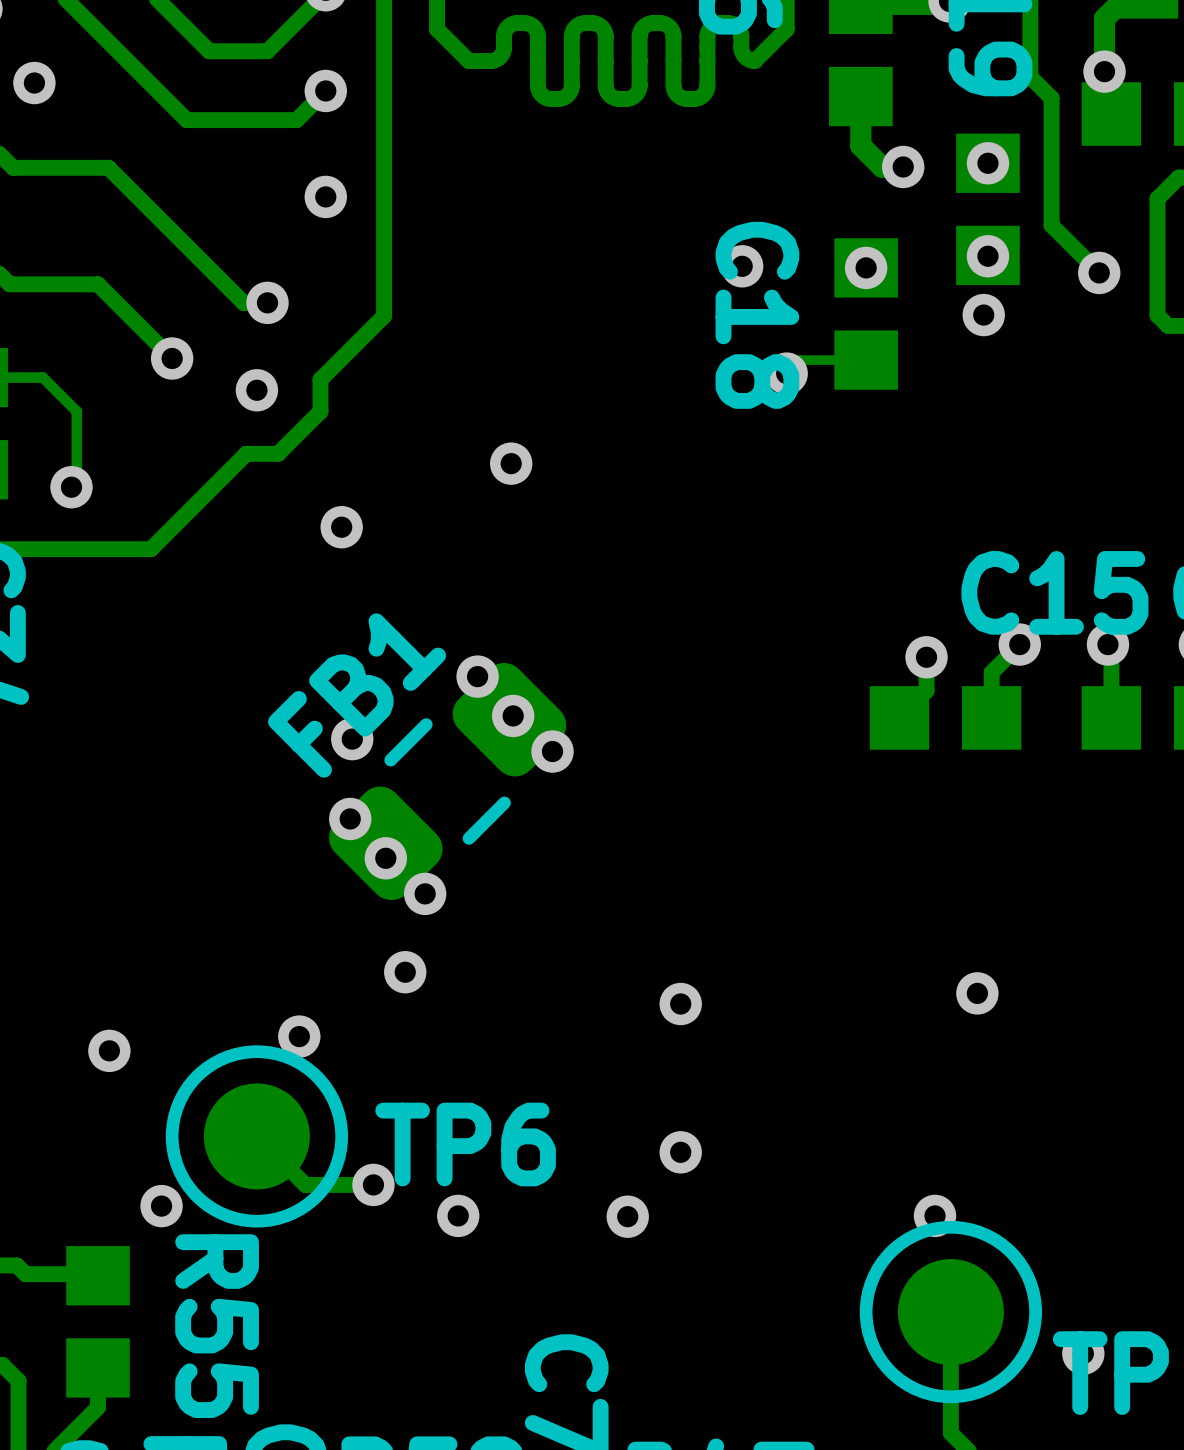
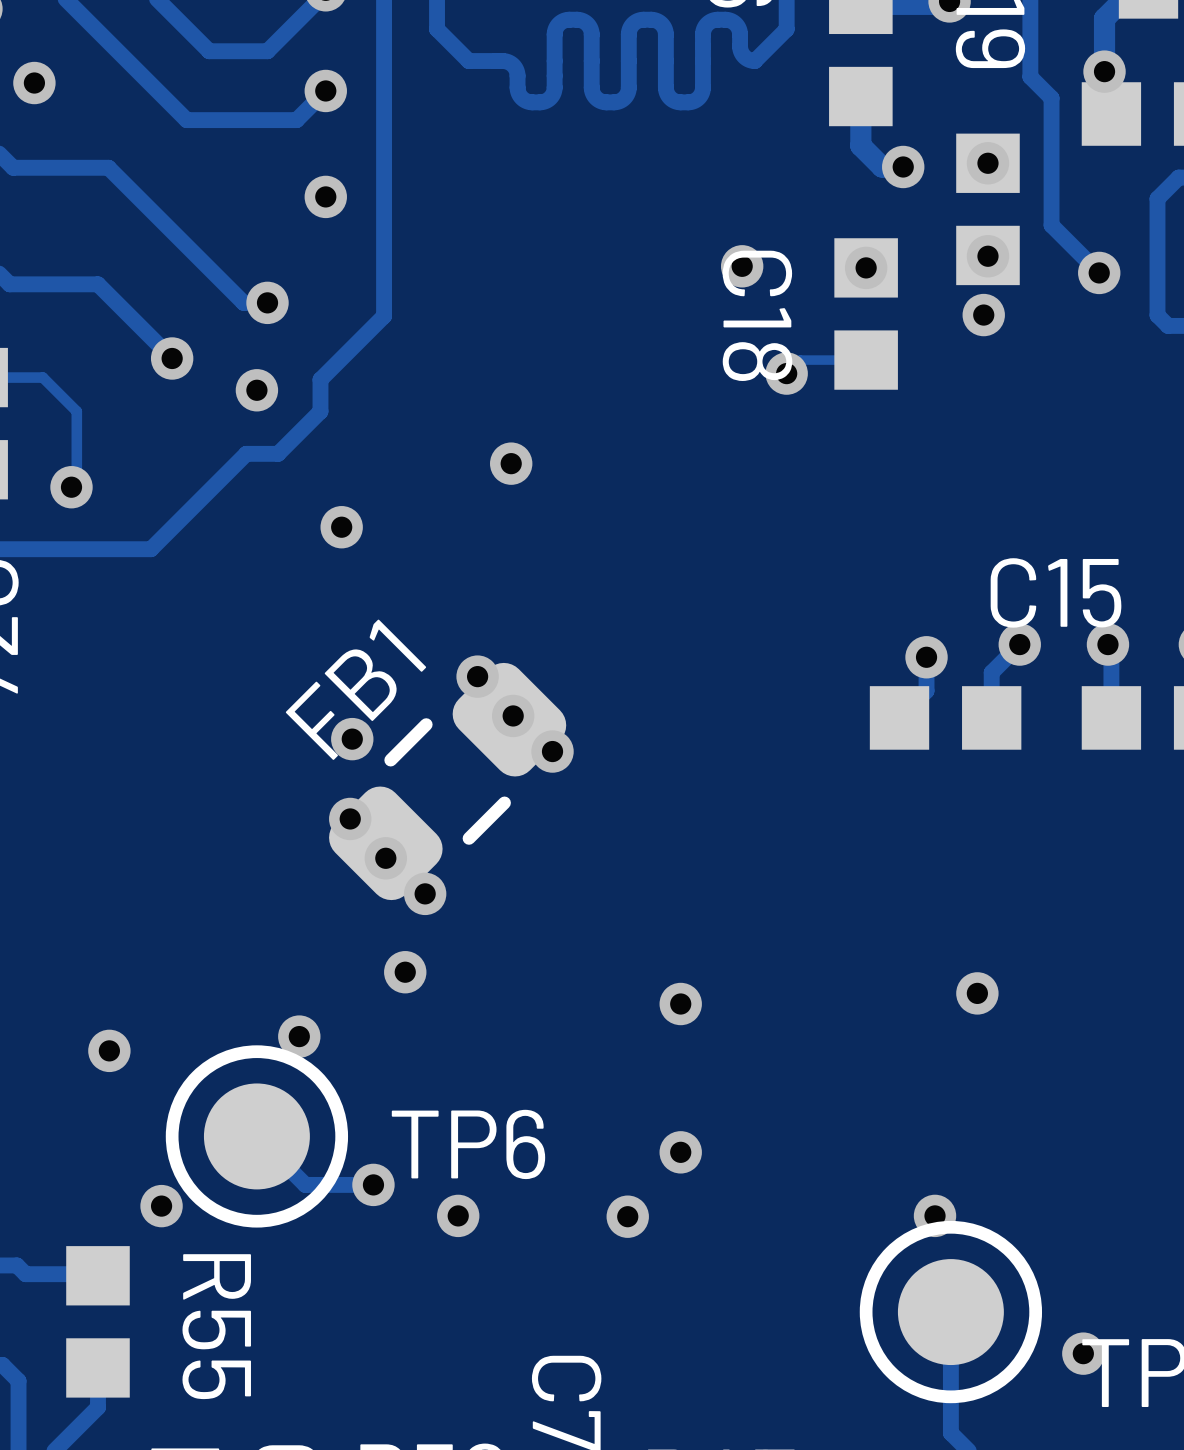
track: (754, 61) (747, 58) (742, 53) (740, 33) (736, 26) (727, 23) (713, 25) (707, 35) (707, 88) (702, 96) (693, 98) (681, 97) (674, 89) (673, 33) (669, 27) (662, 23) (648, 23) (640, 30) (639, 88) (635, 95) (629, 98) (614, 98) (607, 91) (605, 33) (601, 27) (595, 23) (580, 23) (573, 30) (571, 86) (568, 93) (562, 98) (546, 98) (539, 91) (537, 35) (535, 29) (530, 24) (516, 23) (507, 27) (504, 33) (502, 53) (497, 58) (490, 61) -> (754, 61) (746, 58) (741, 52) (739, 31) (734, 22) (725, 19) (709, 21) (703, 32) (702, 90) (697, 99) (688, 102) (674, 100) (666, 92) (665, 31) (661, 24) (654, 20) (638, 20) (630, 28) (628, 90) (624, 98) (617, 101) (601, 101) (593, 93) (591, 32) (588, 25) (581, 20) (564, 20) (556, 28) (554, 89) (552, 95) (546, 100) (530, 102) (523, 99) (517, 90) (517, 74) (514, 66) (506, 61) (490, 61)

